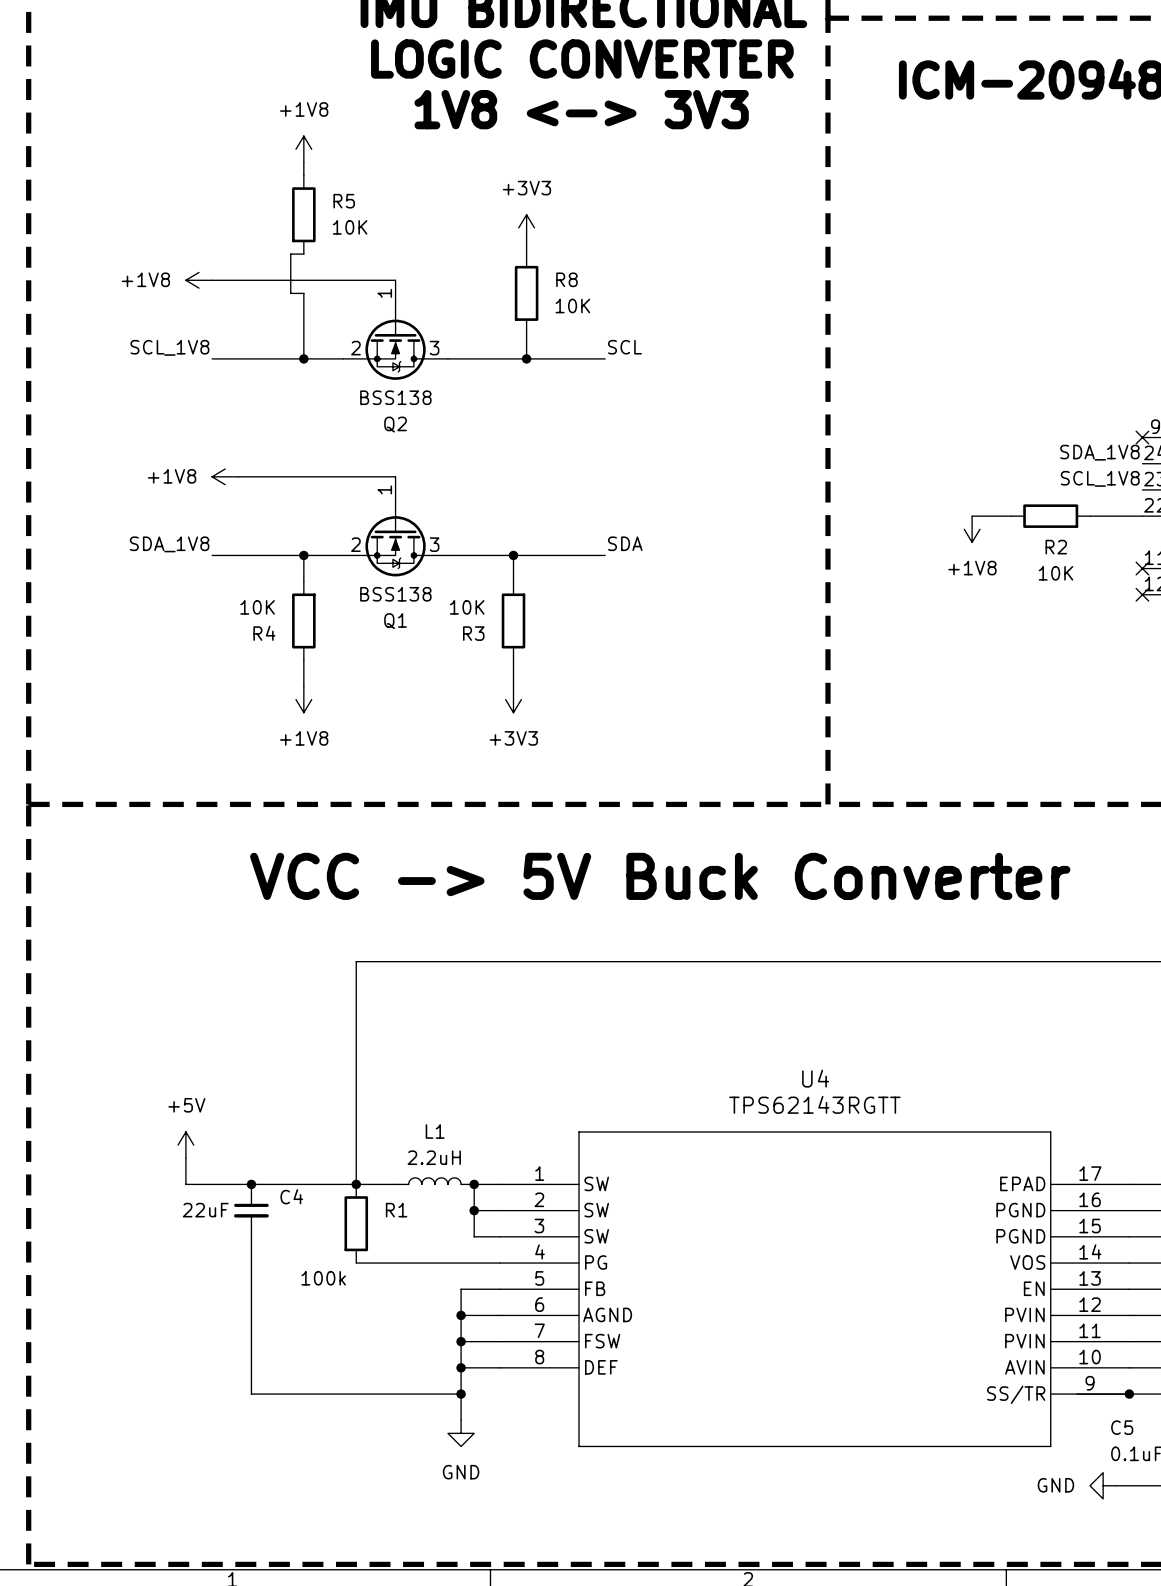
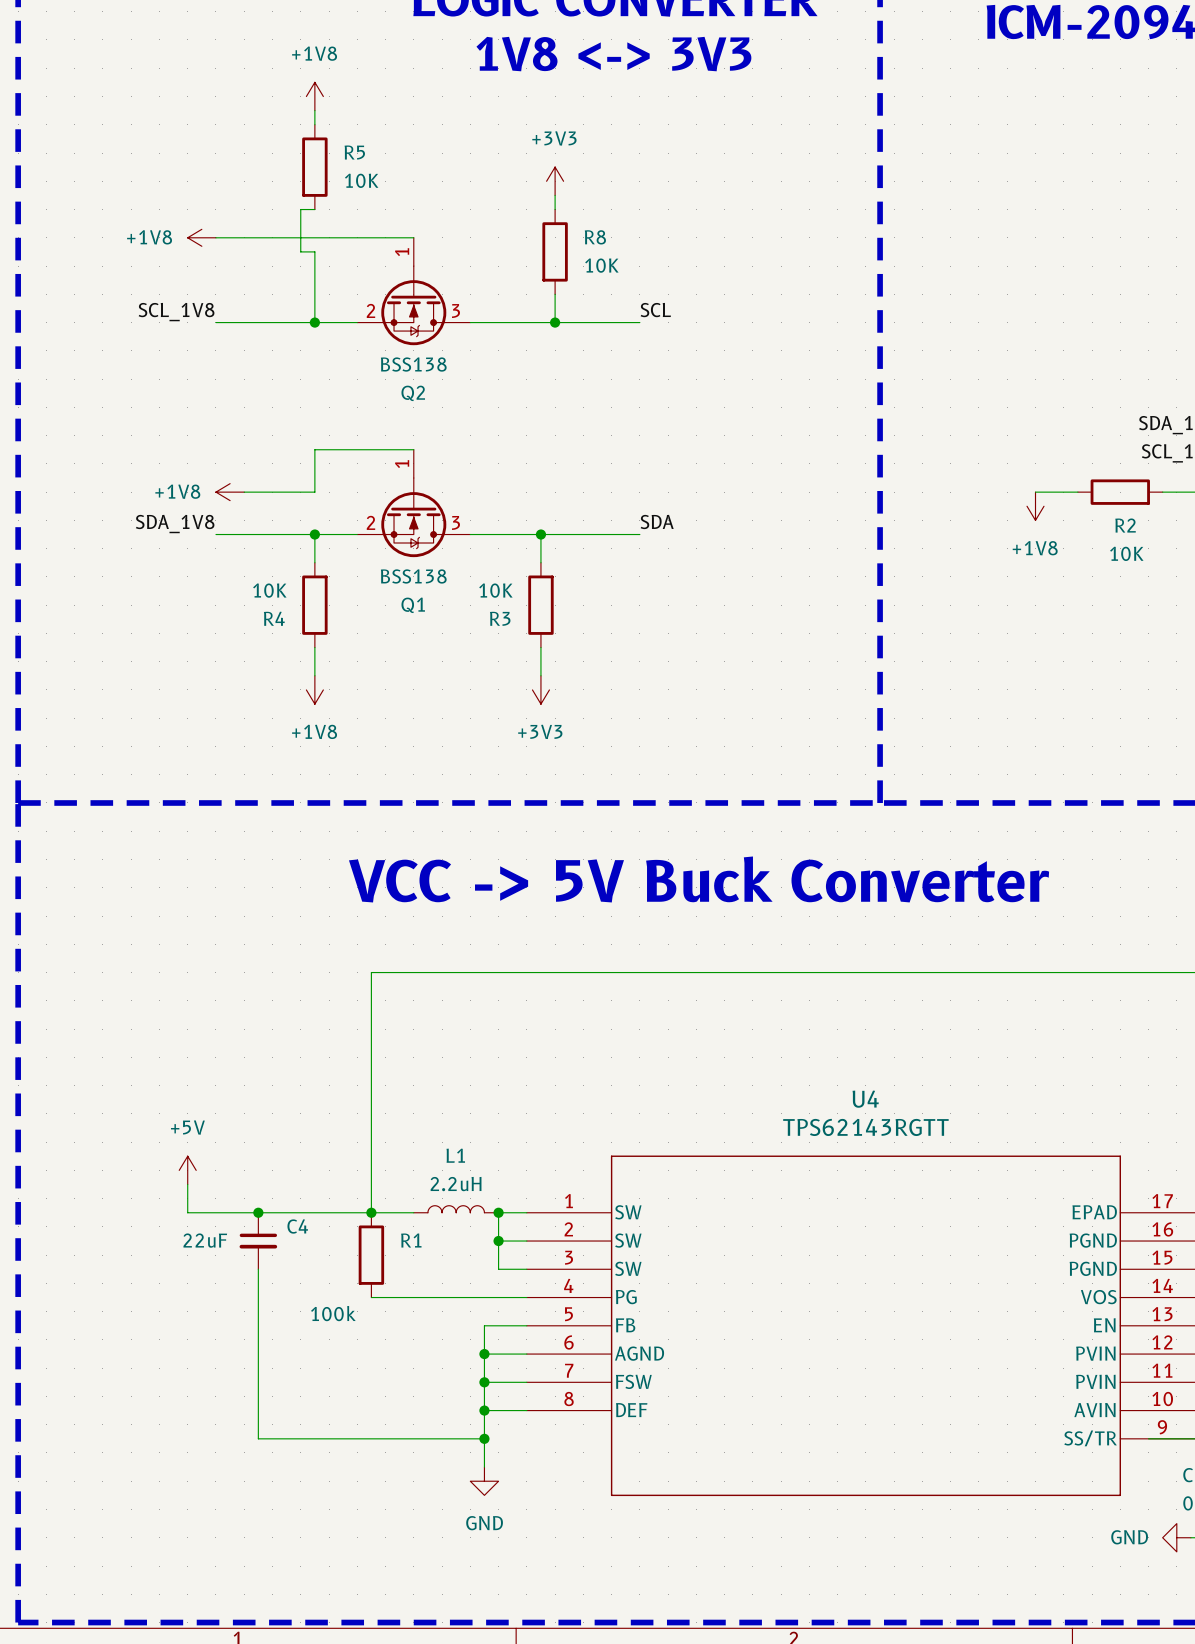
power symbol position: +1V8 (225, 476) -> +1V8 (230, 492)
wire: (238, 476) (303, 476) -> (244, 492) (314, 492) (314, 449)

